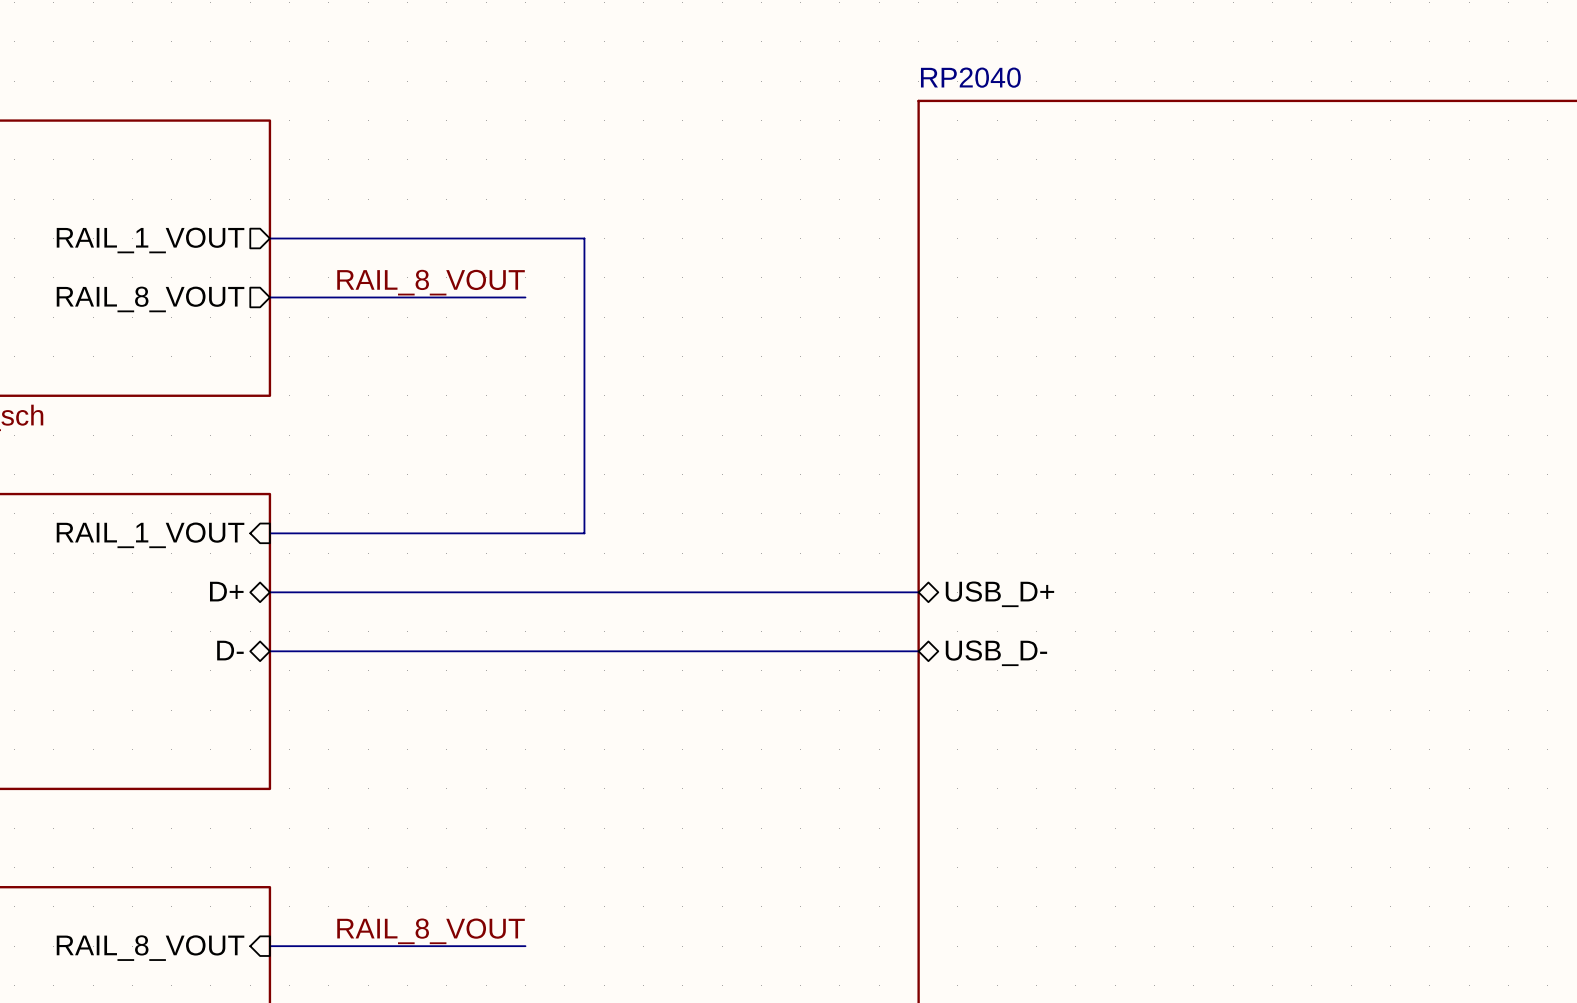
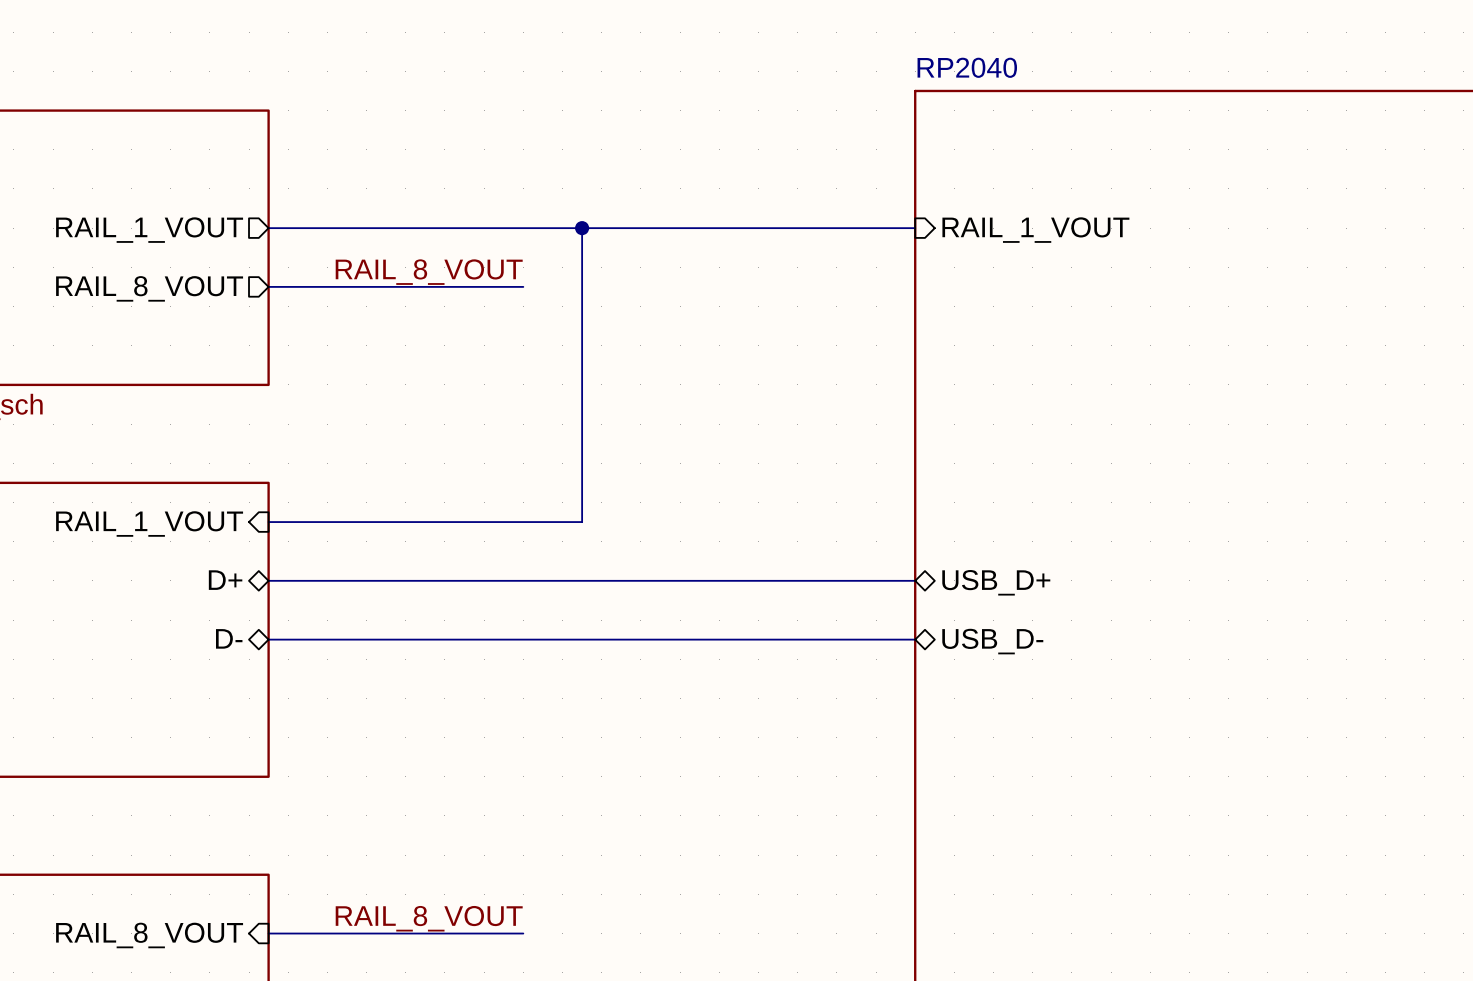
wire: none -> (582, 228) (915, 228)
junction: none -> (582, 228)
sheet pin: none -> RAIL_1_VOUT (1035, 230)

